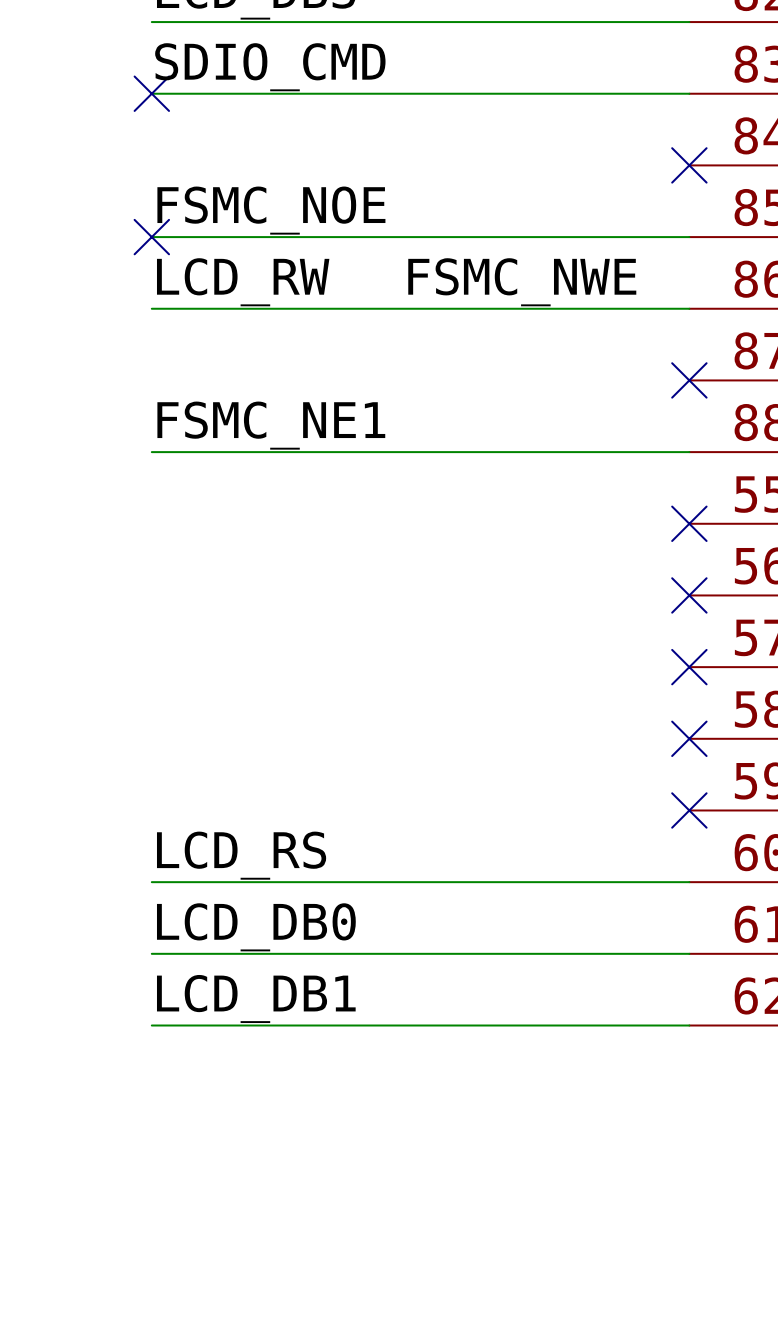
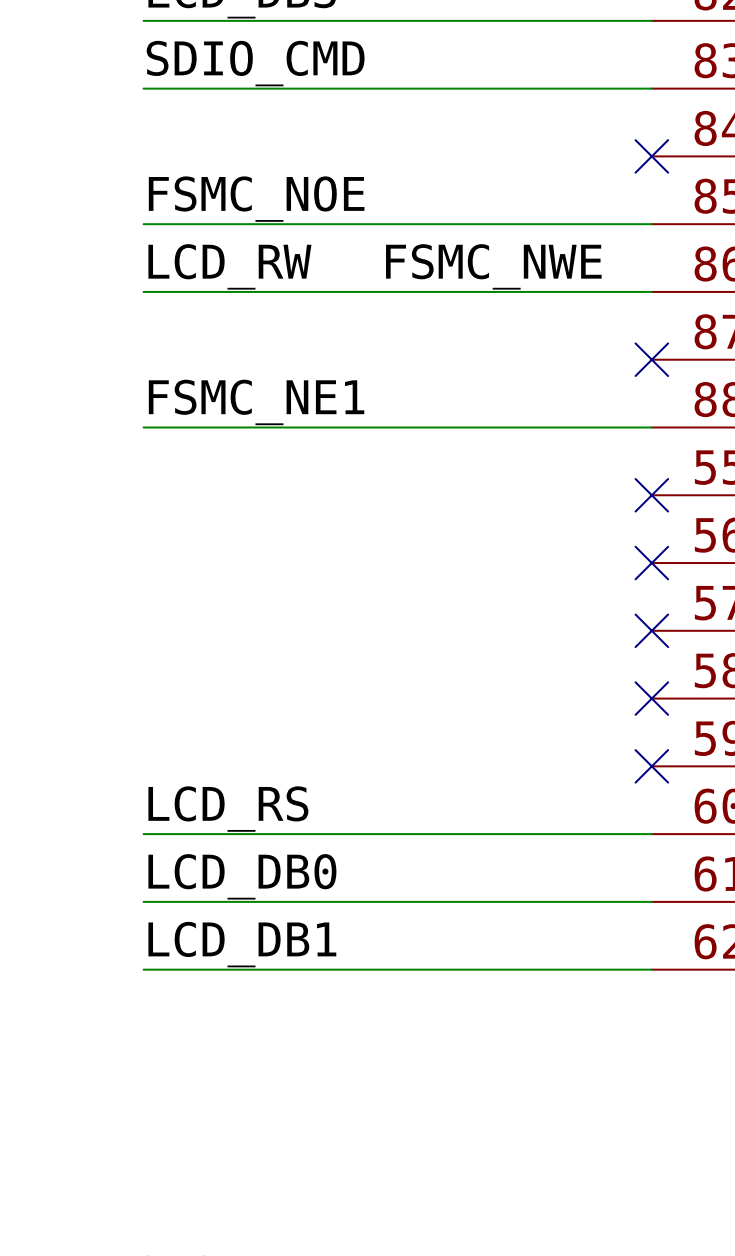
no-connect mark: (151, 93) -> none
no-connect mark: (151, 237) -> none

